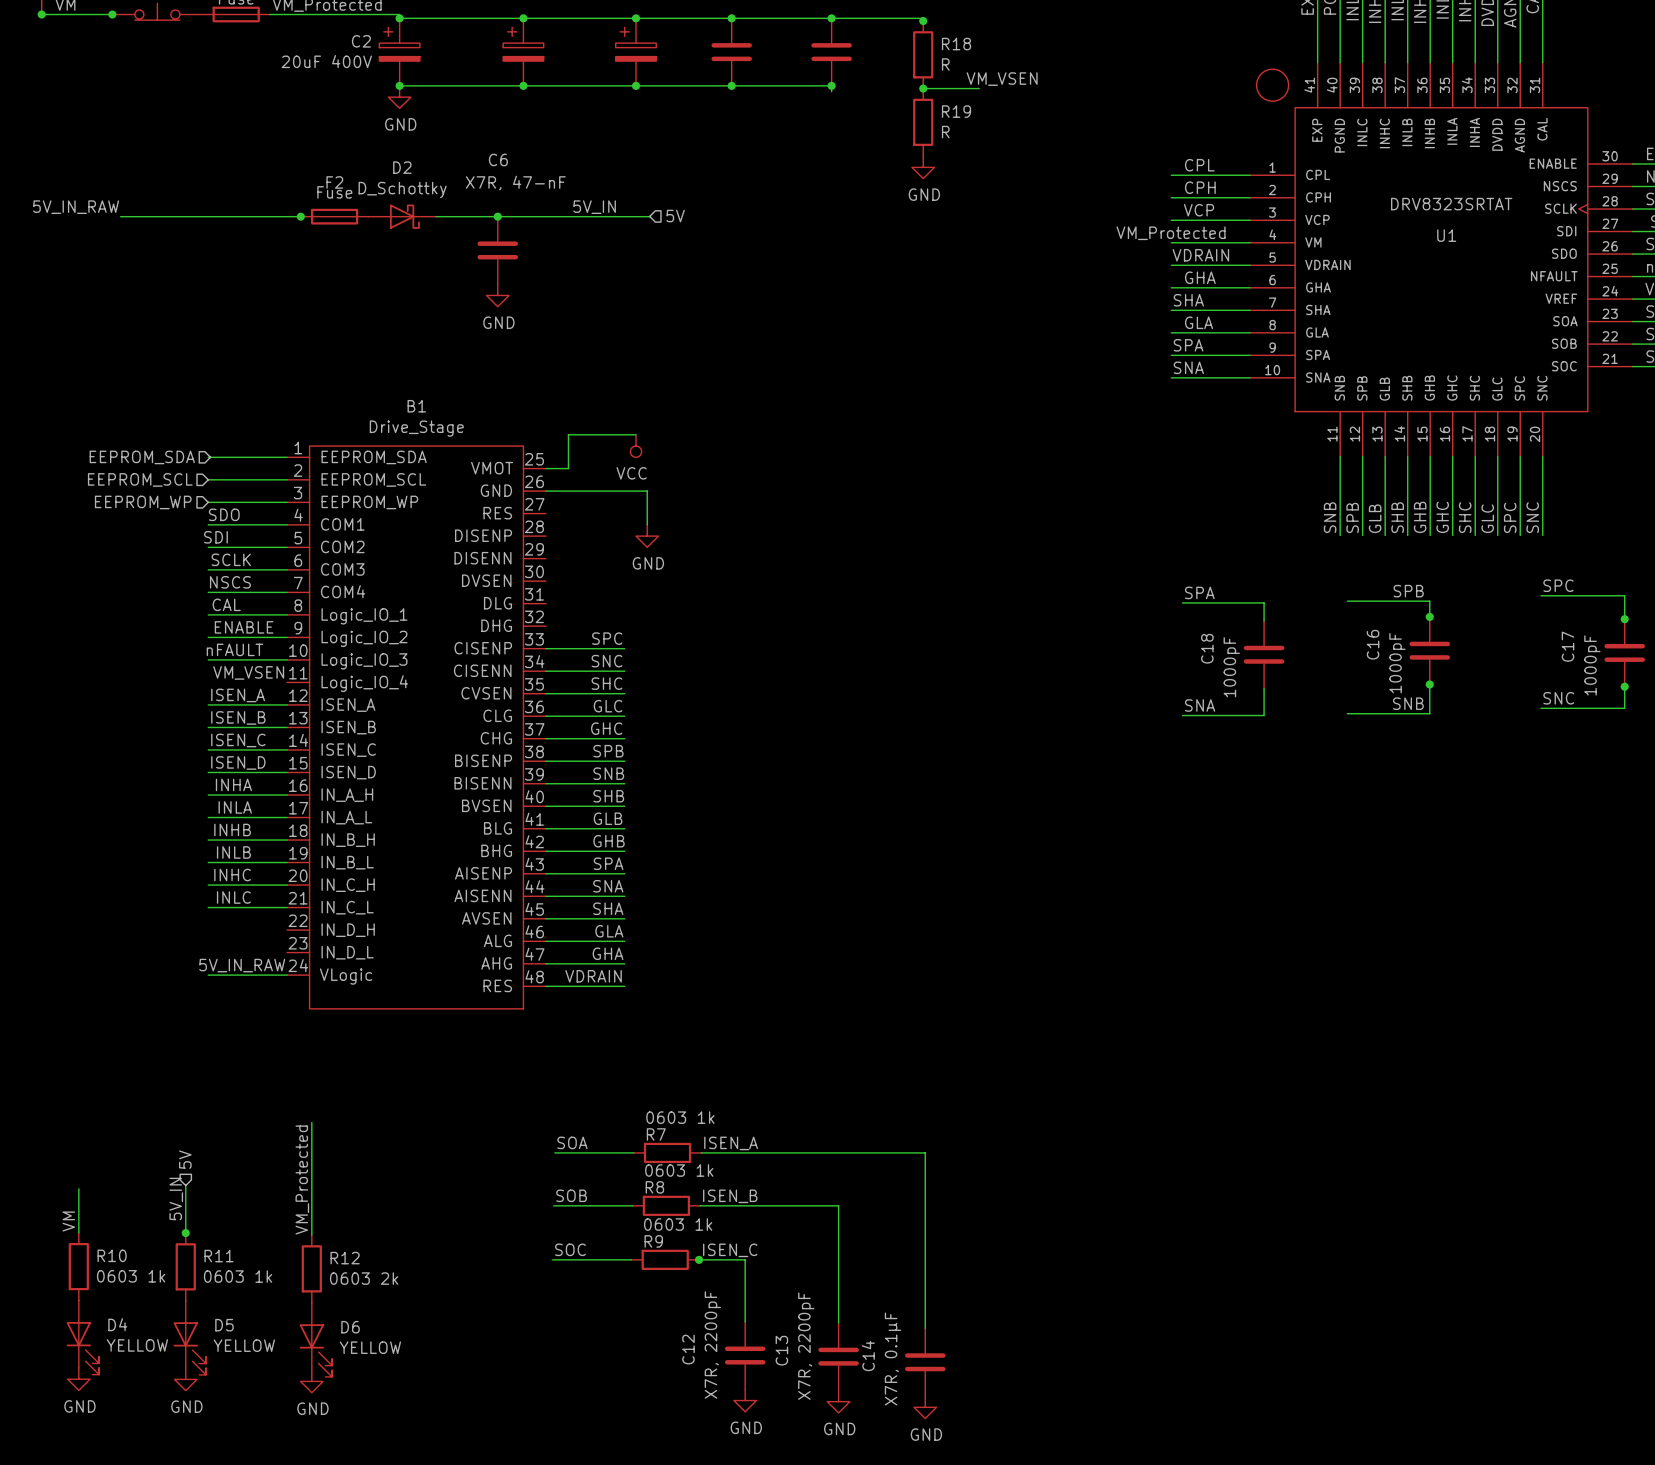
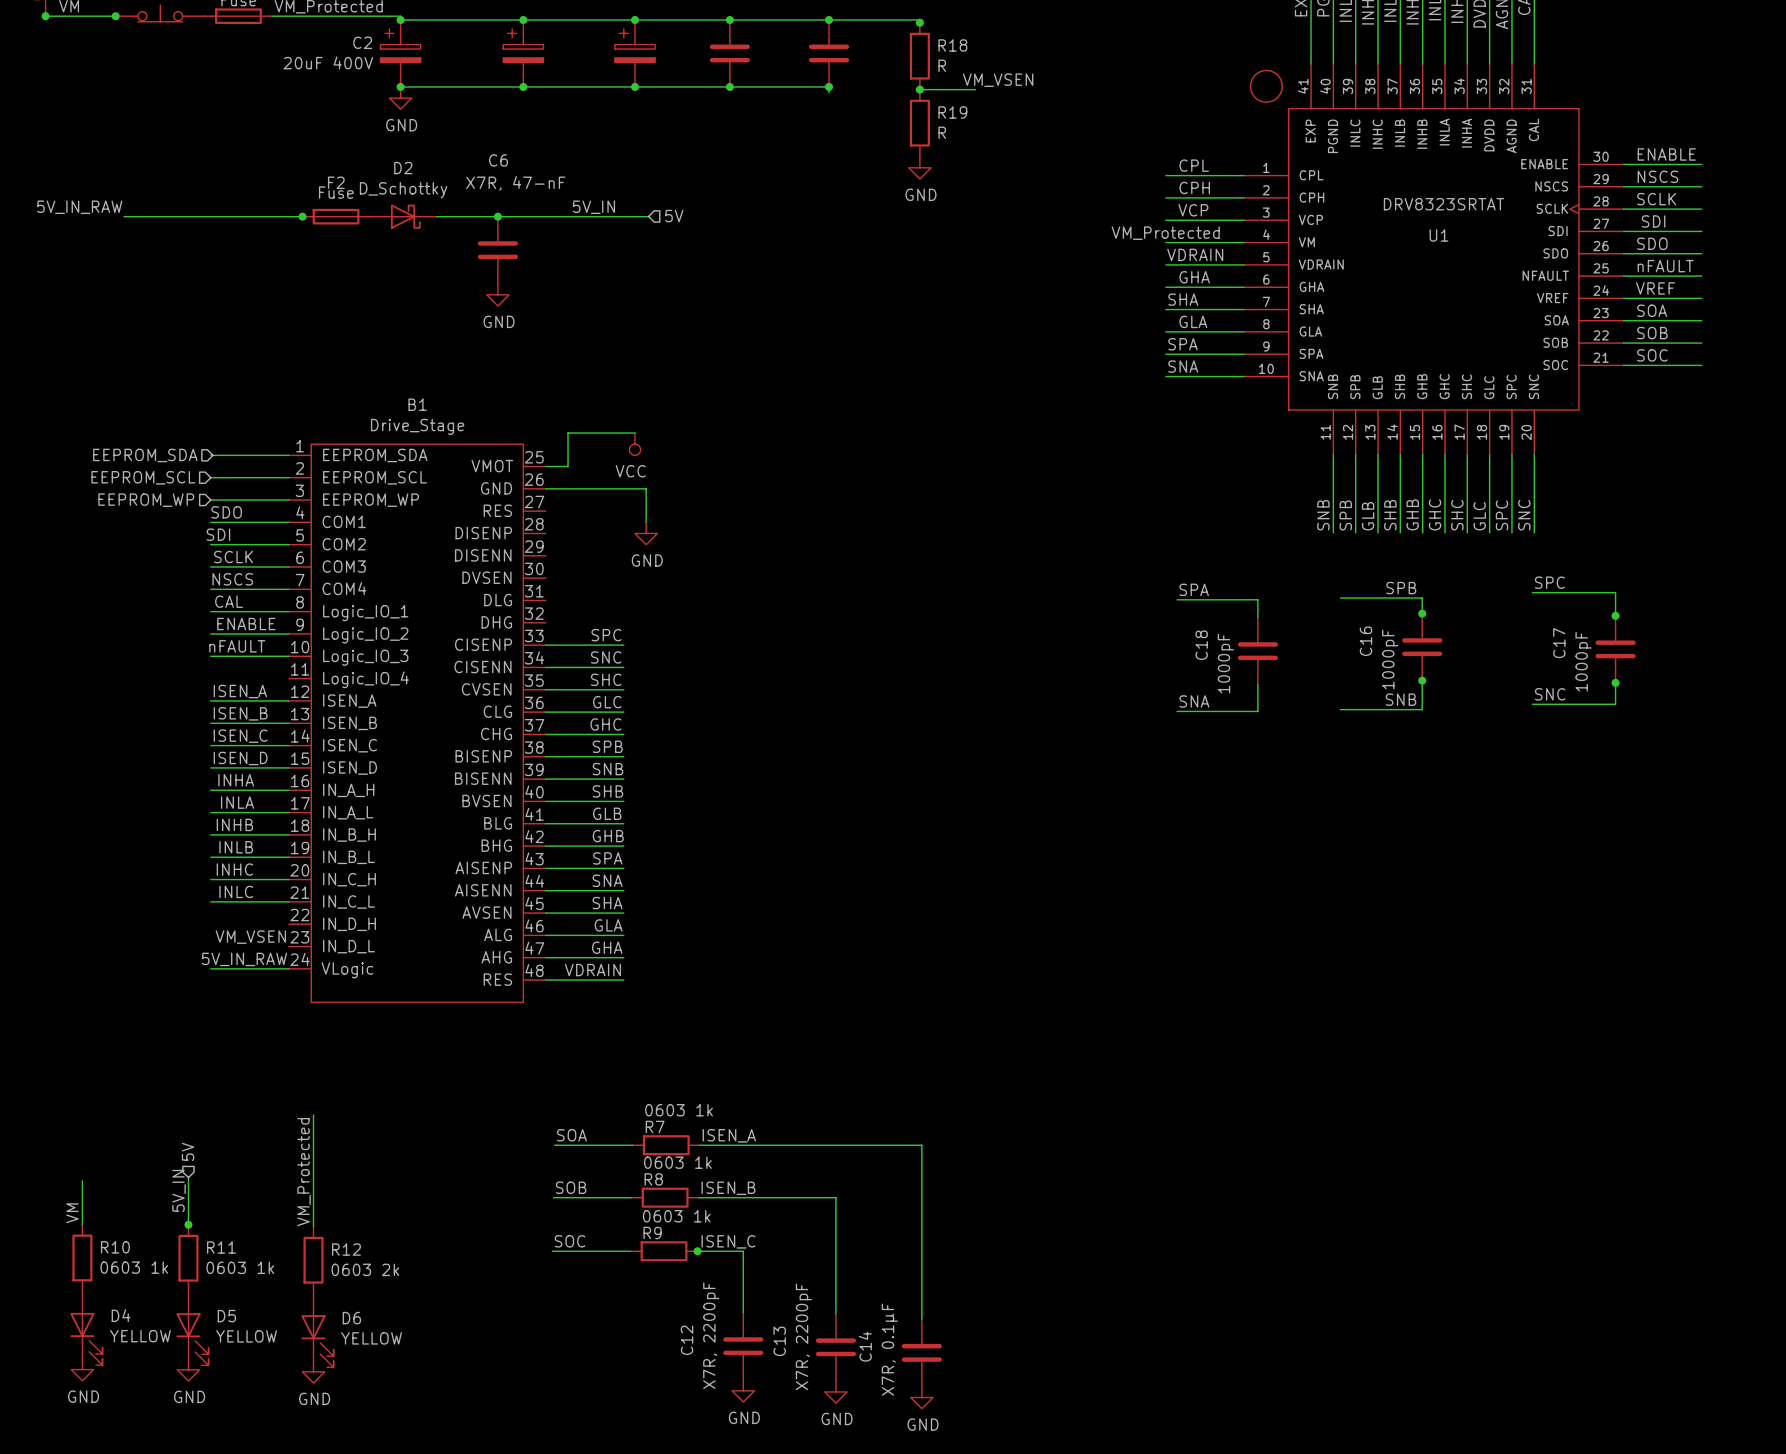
label: VM_VSEN (248, 672) -> none
label: none -> VM_VSEN (250, 937)

